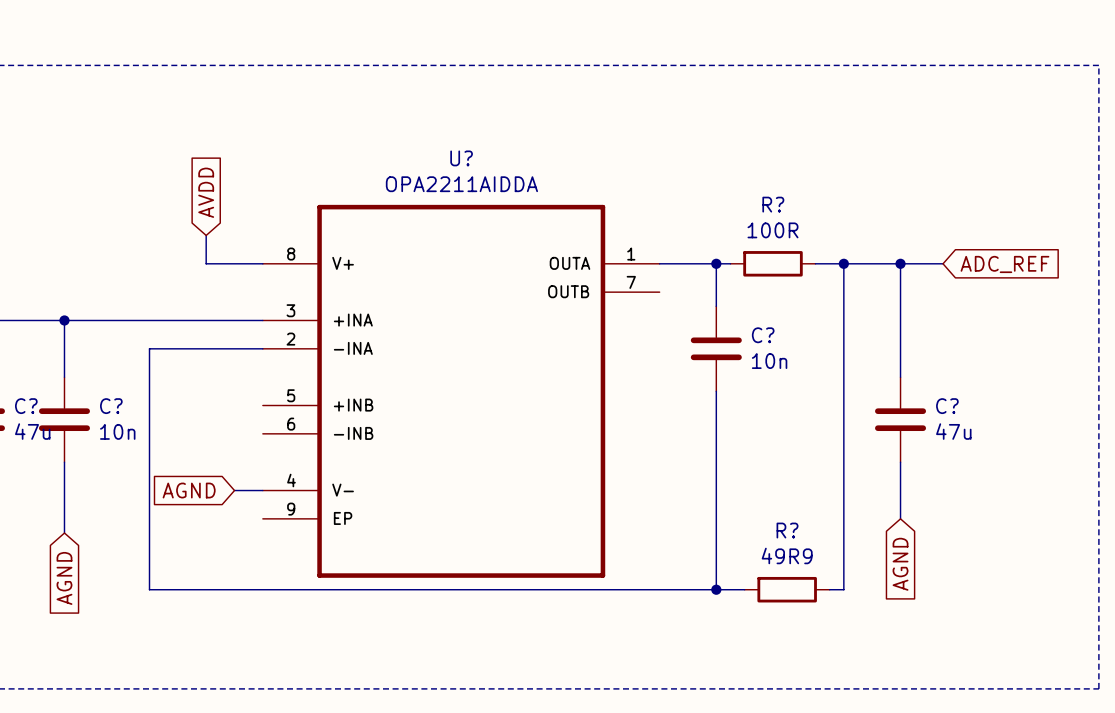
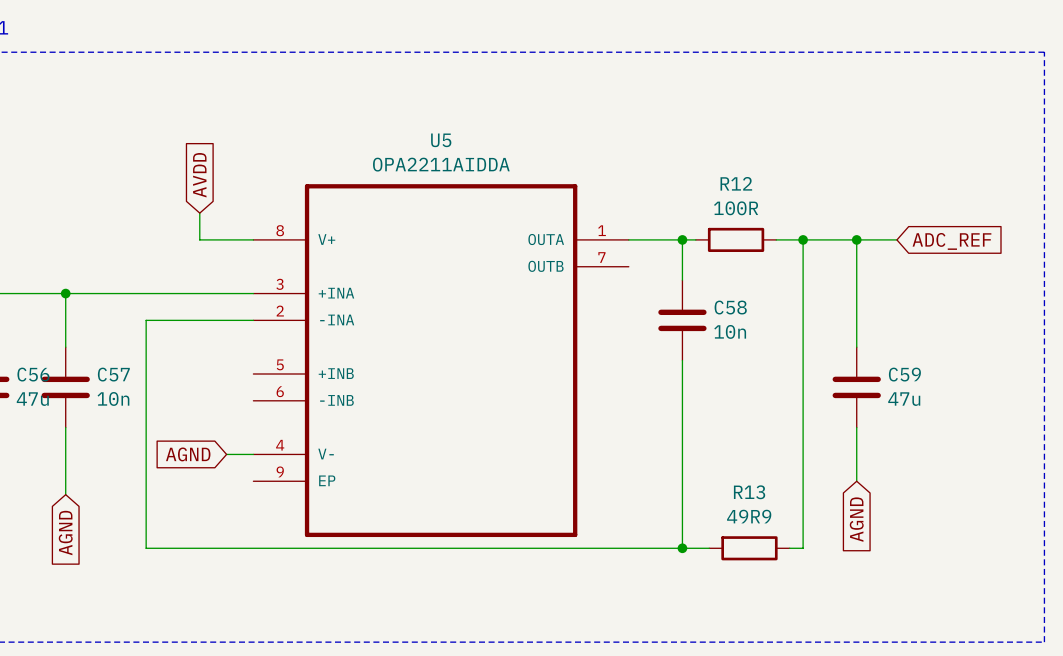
U? name: U? (461, 158) -> U5 (441, 140)
R? name: R? (773, 204) -> R12 (736, 183)
C? name: C? (763, 335) -> C58 (730, 307)
C? name: C? (26, 406) -> C56 (33, 374)
C? name: C? (111, 406) -> C57 (113, 374)
C? name: C? (947, 406) -> C59 (904, 374)
R? name: R? (787, 530) -> R13 (749, 492)

